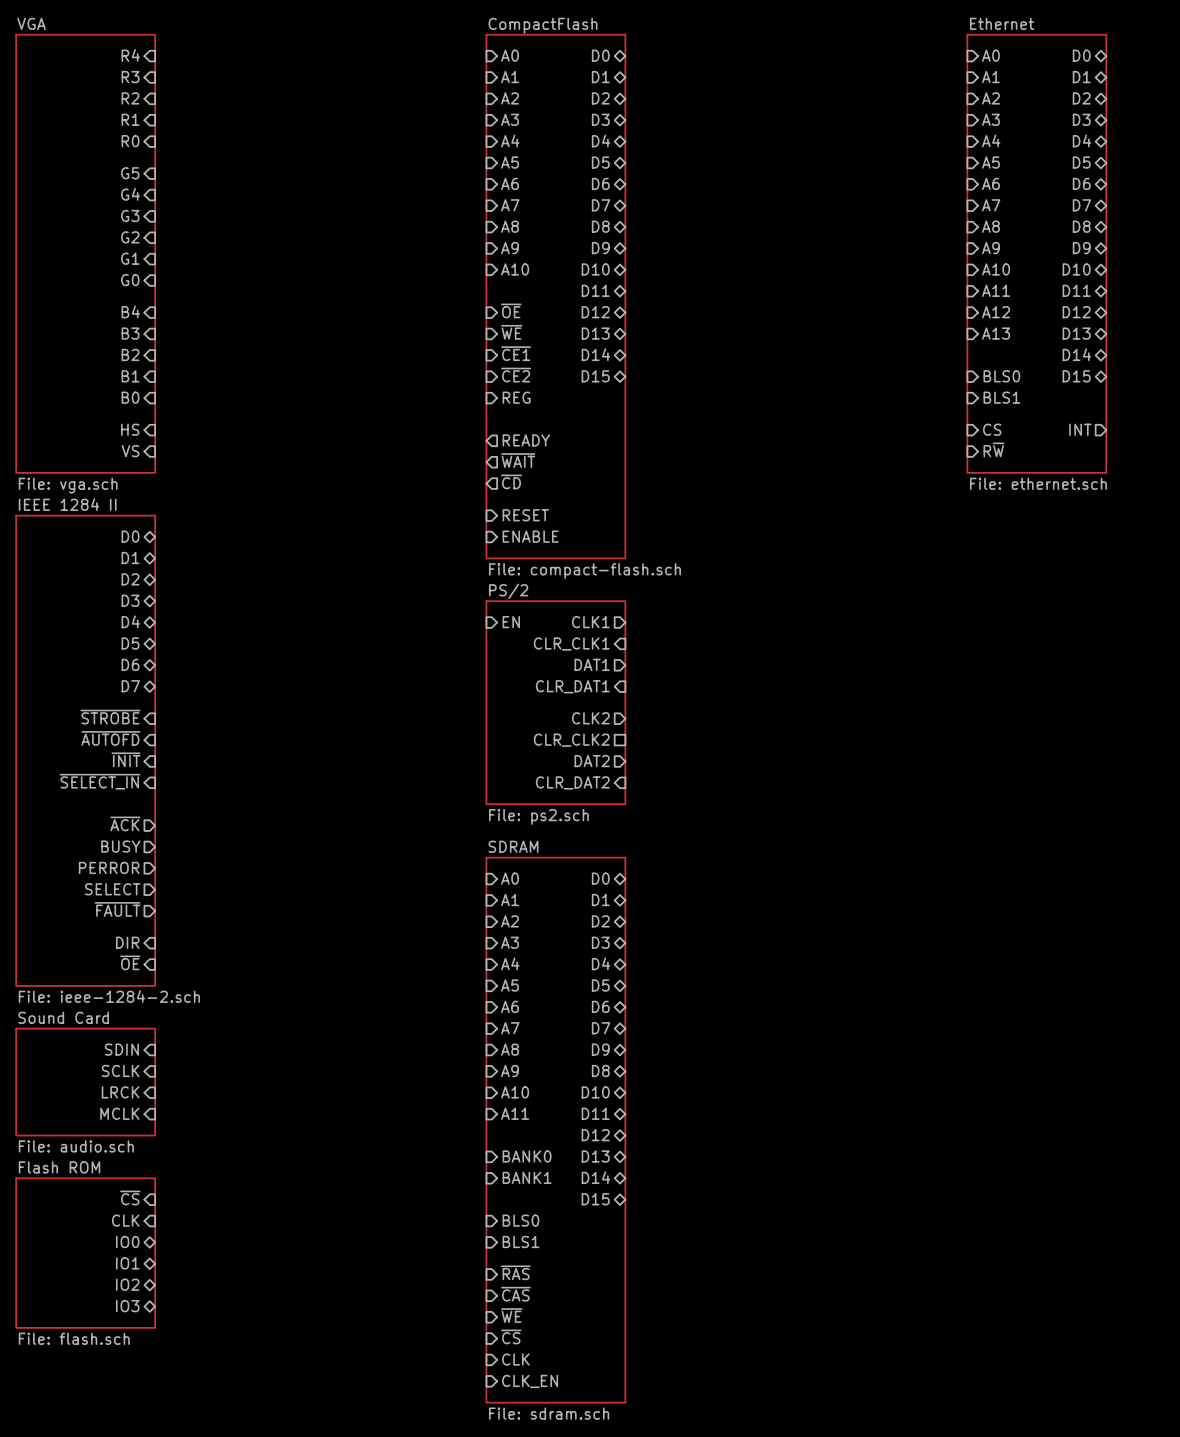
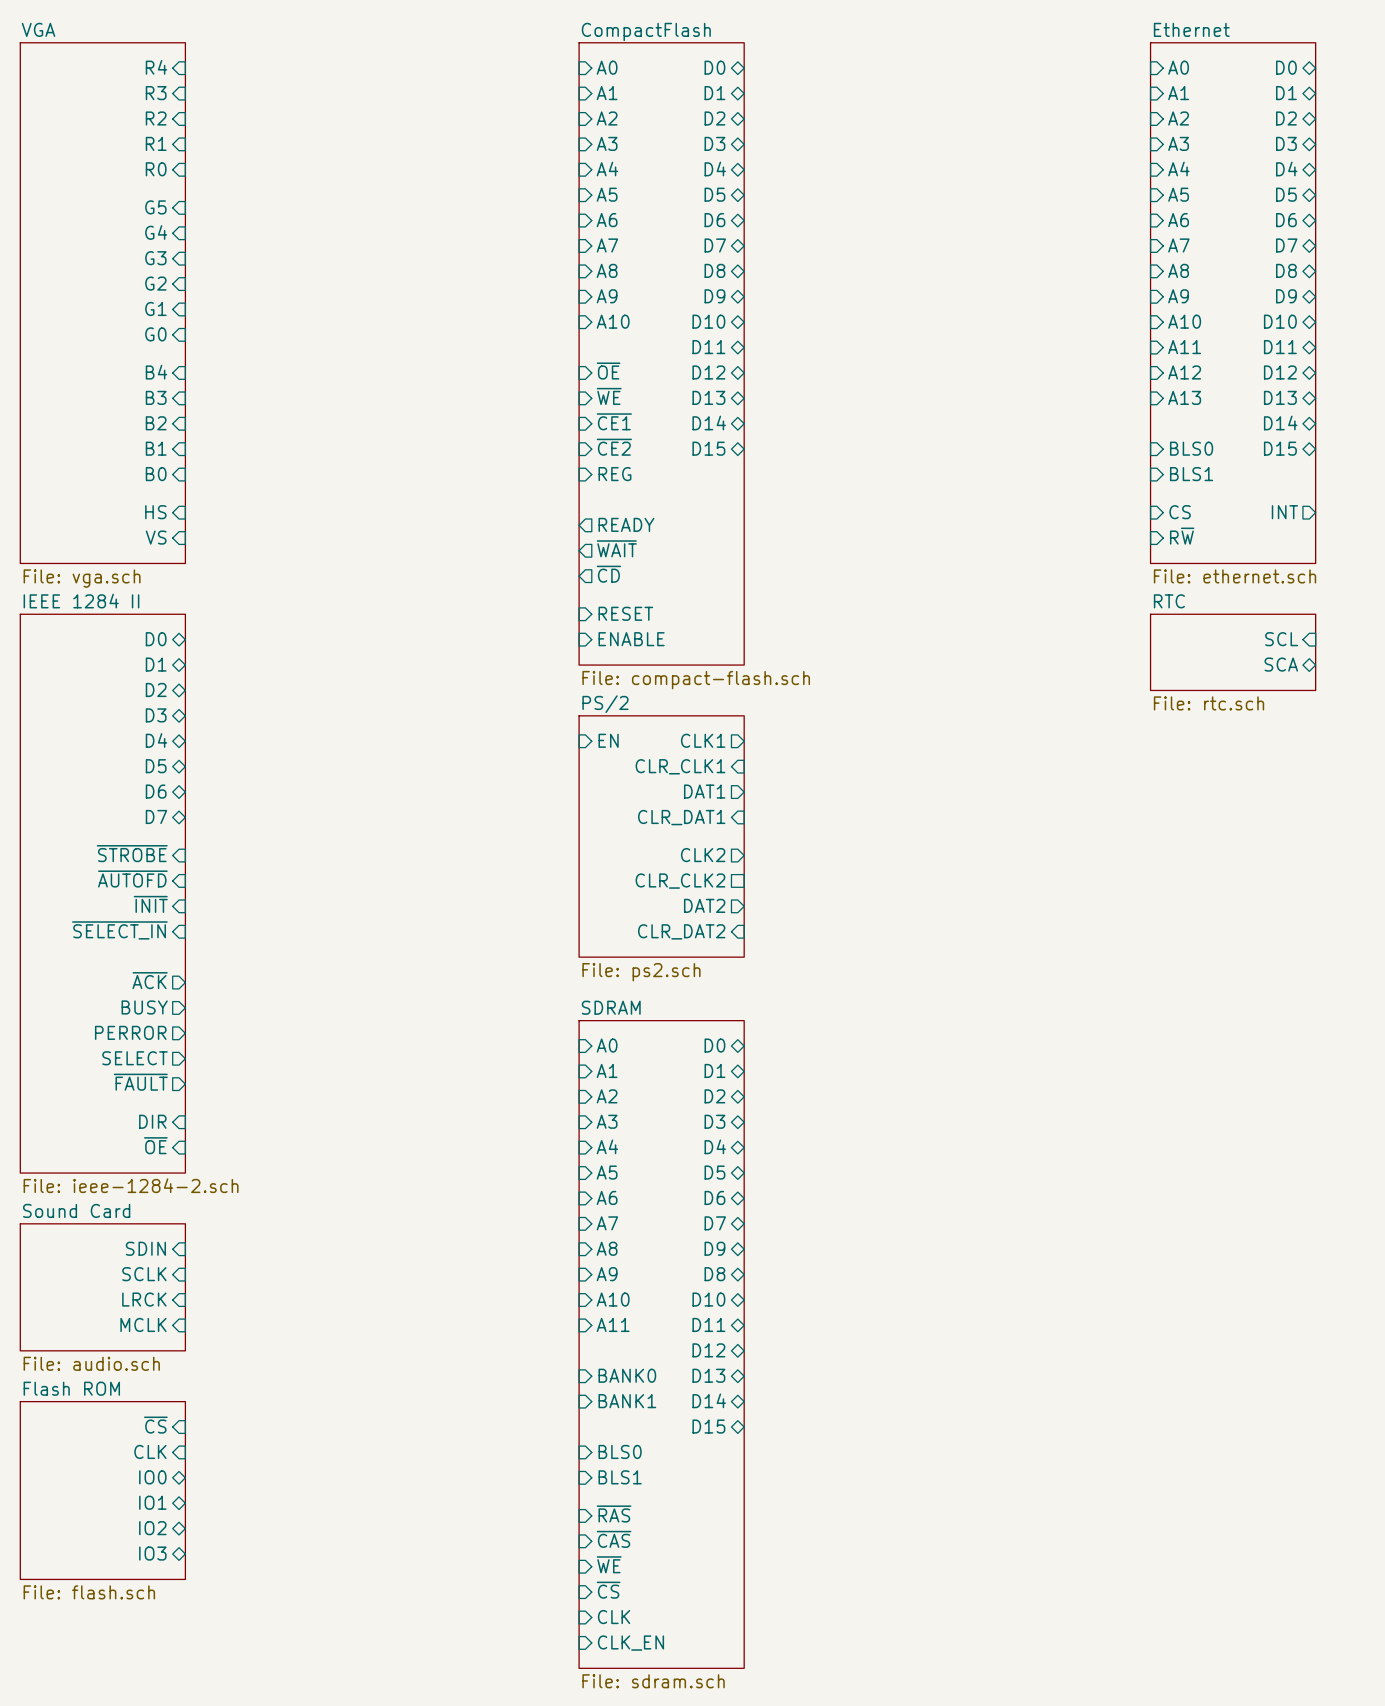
sheet pin: none -> SCL (1281, 639)
sheet RTC: none -> File: rtc.sch (1233, 652)
sheet pin: none -> SCA (1281, 664)

